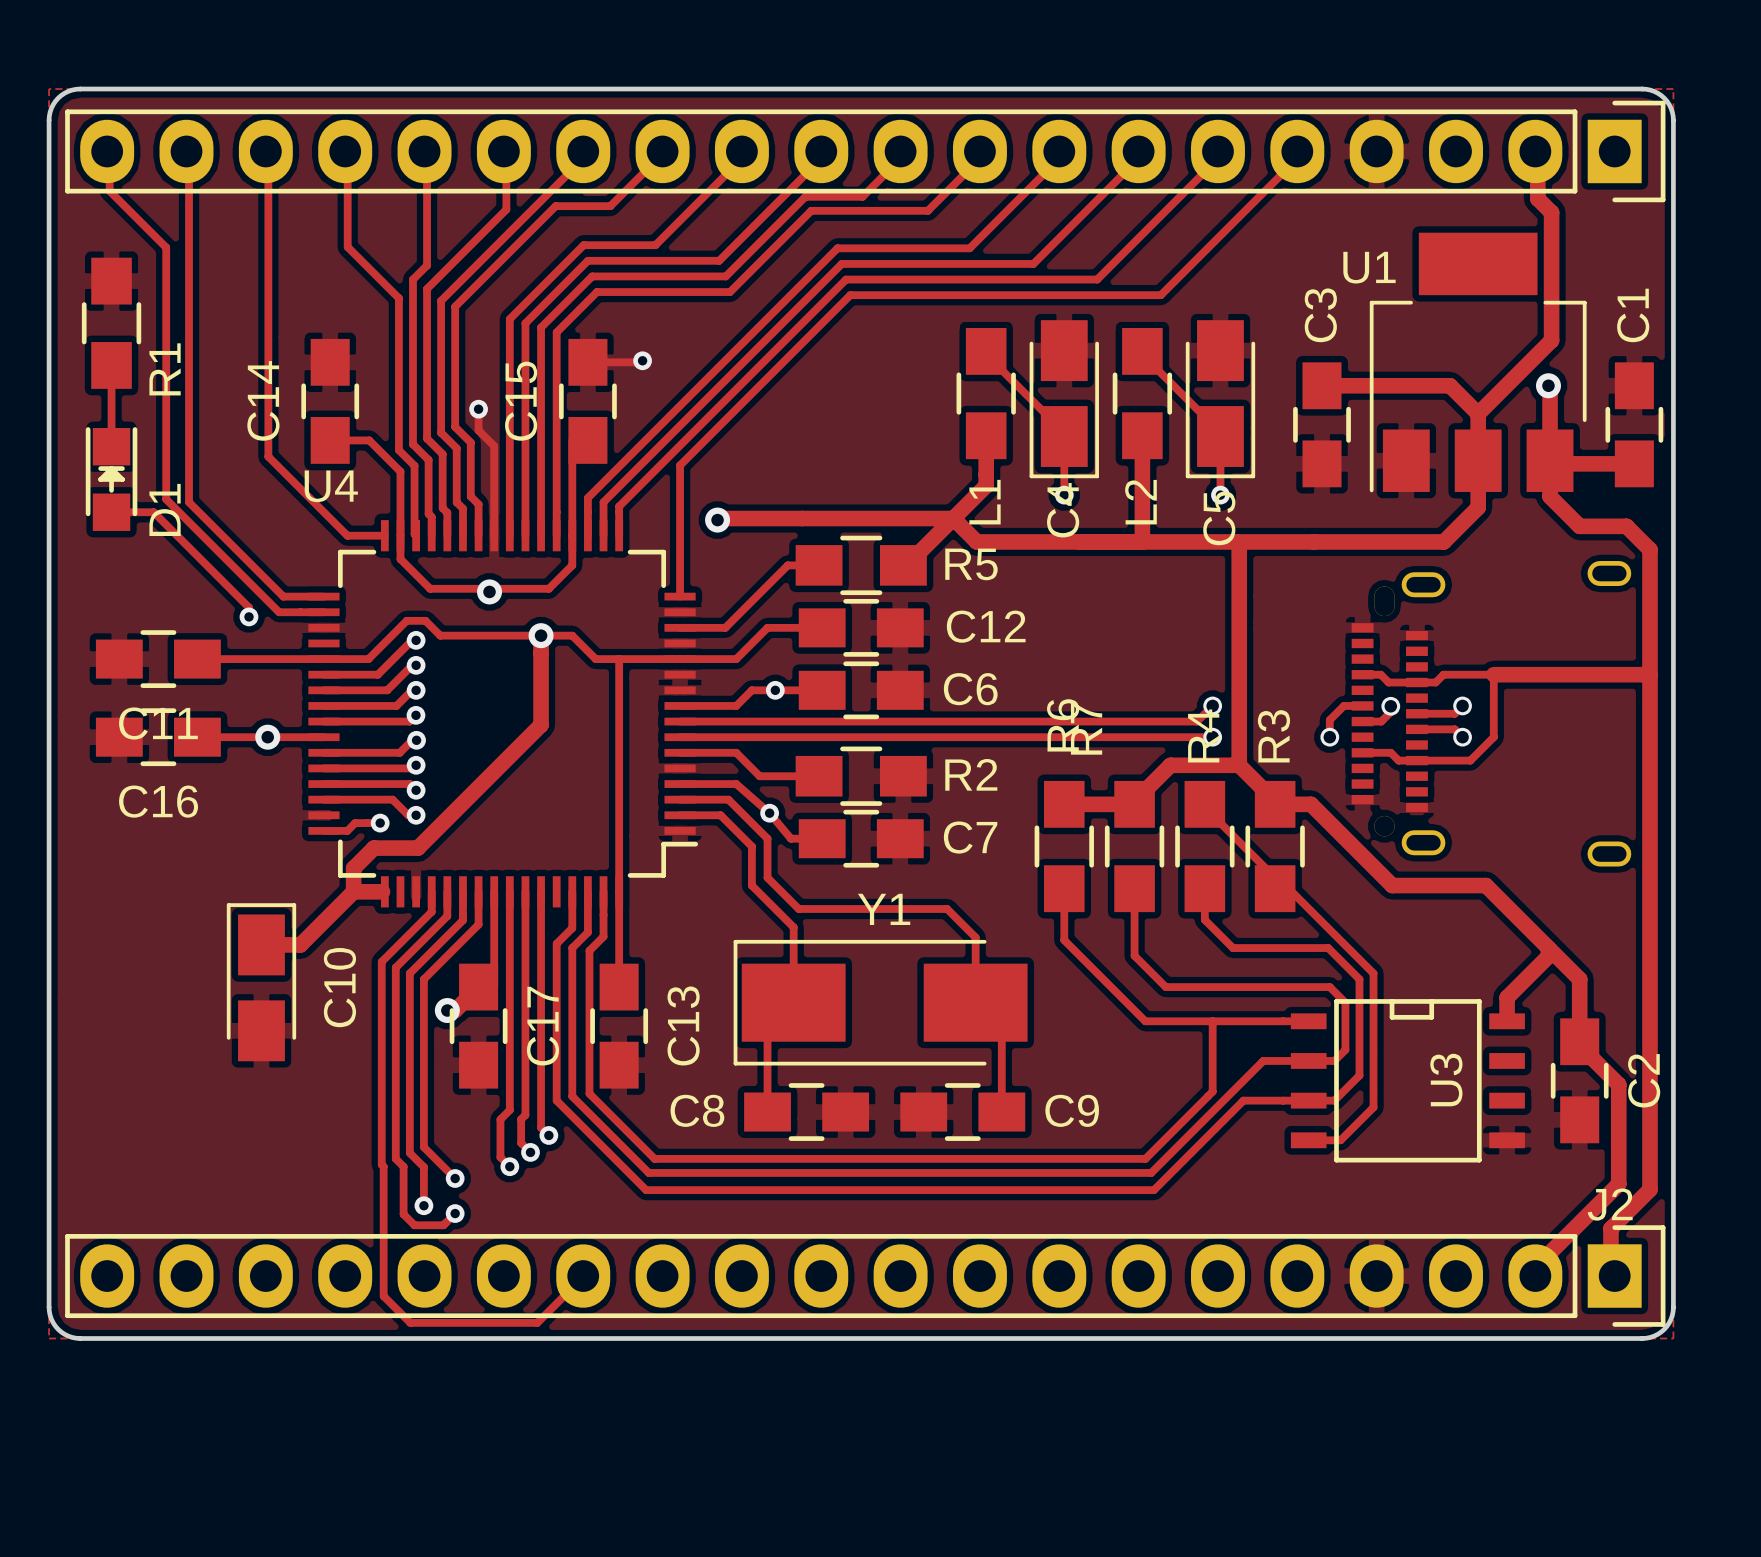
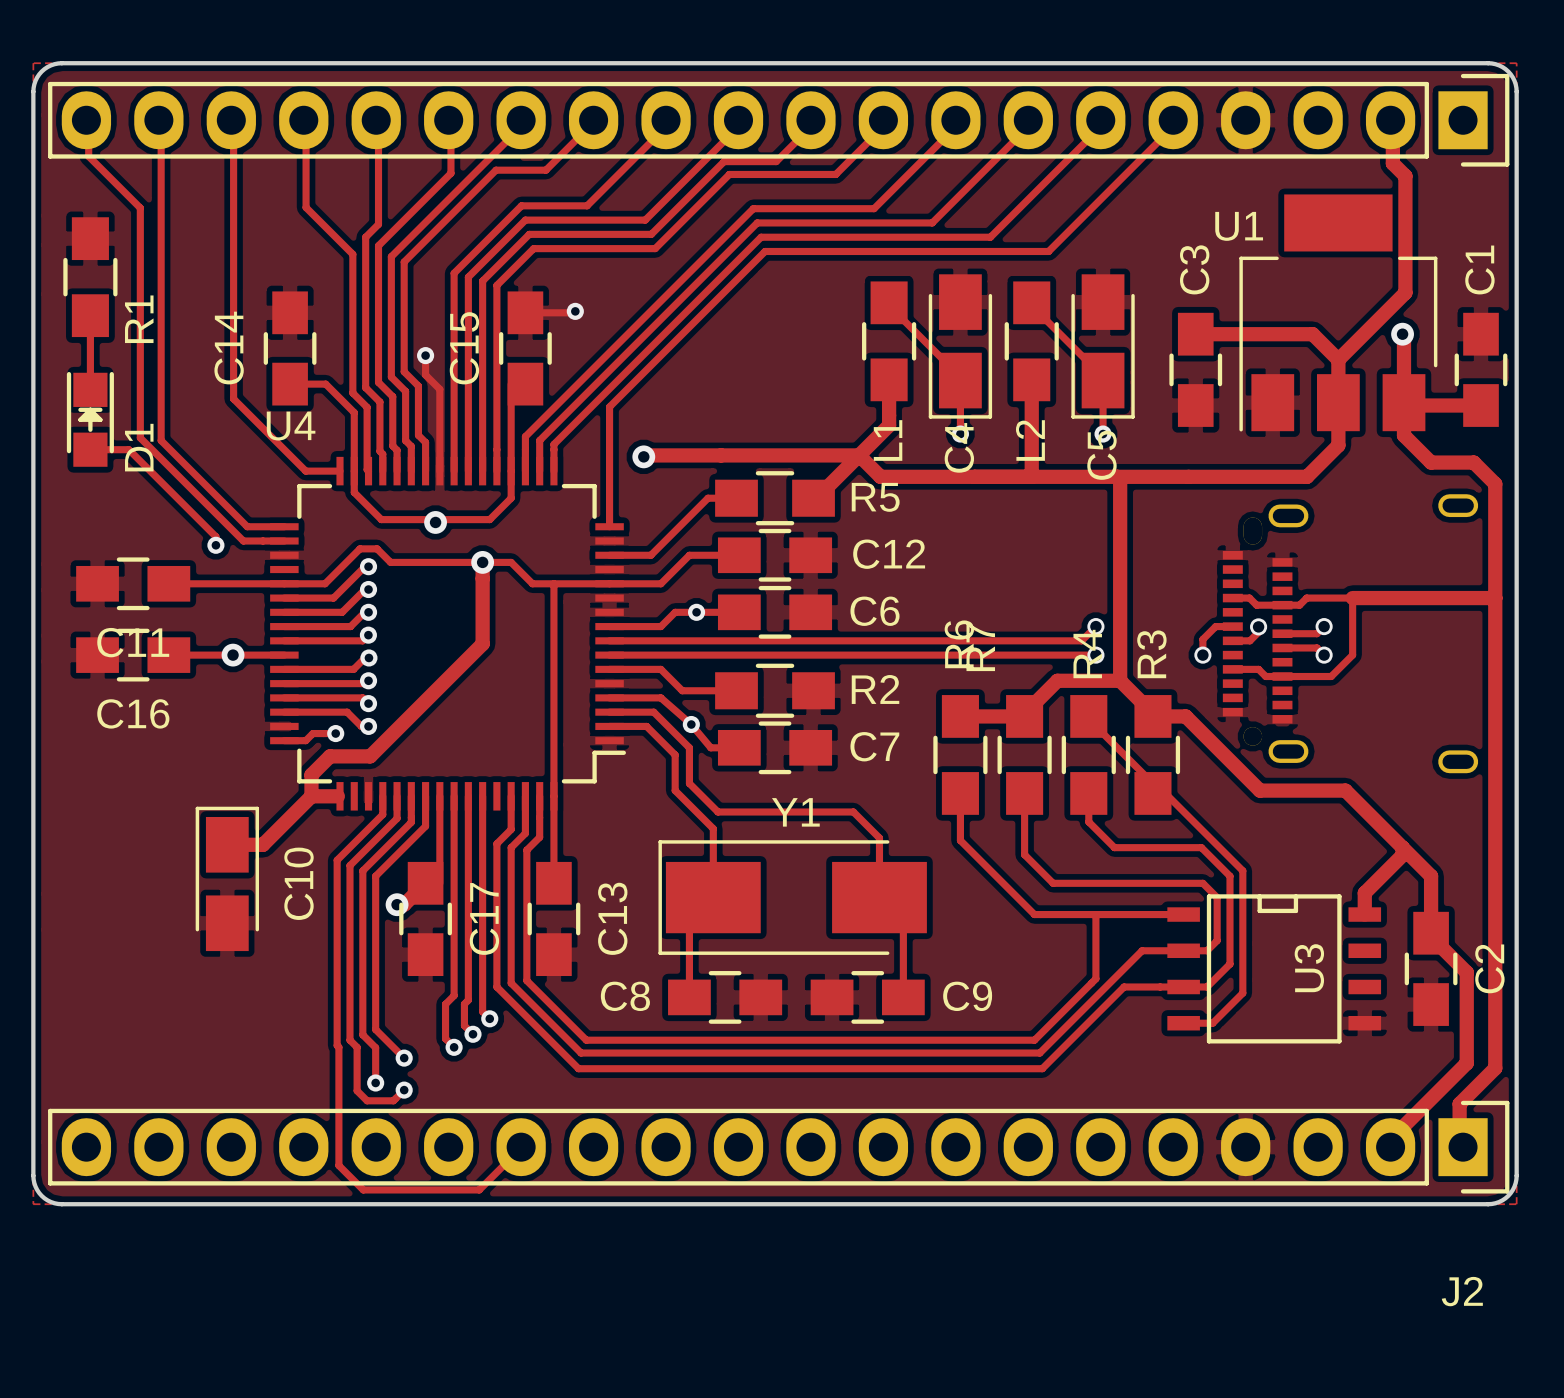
J2 name position: J2 (1610, 1204) -> J2 (1462, 1291)

